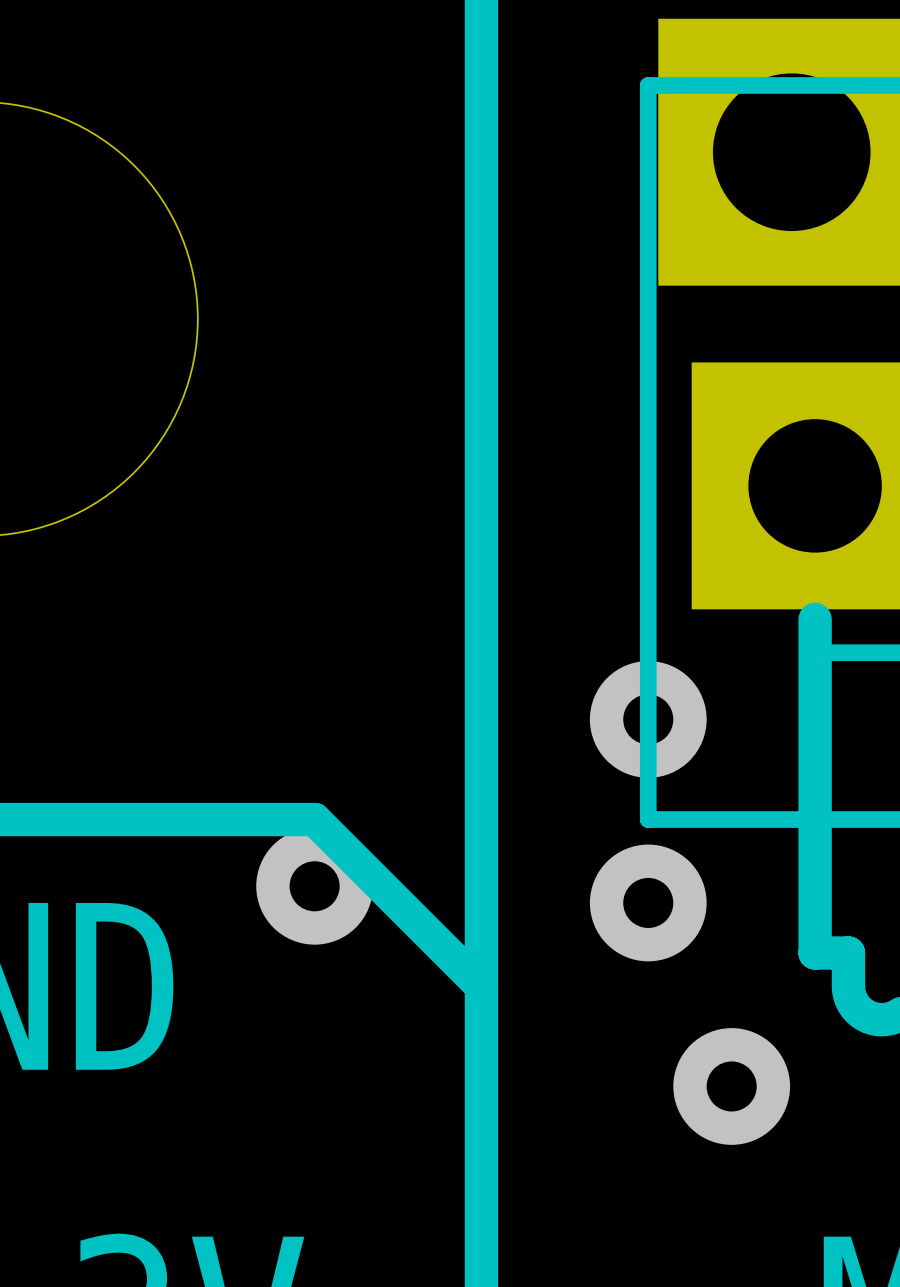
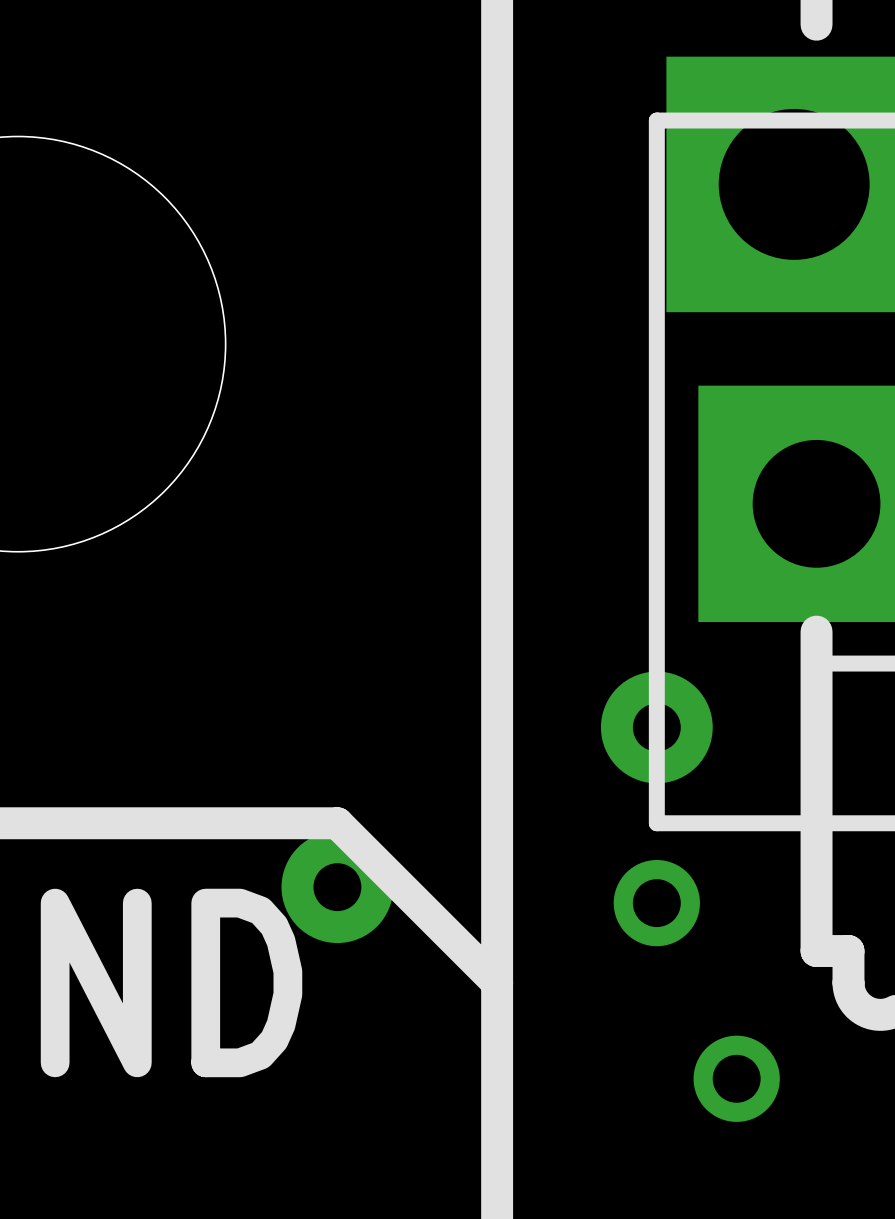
via size: [589, 844, 707, 962] -> [613, 859, 700, 947]
via size: [673, 1028, 791, 1145] -> [693, 1035, 780, 1122]

